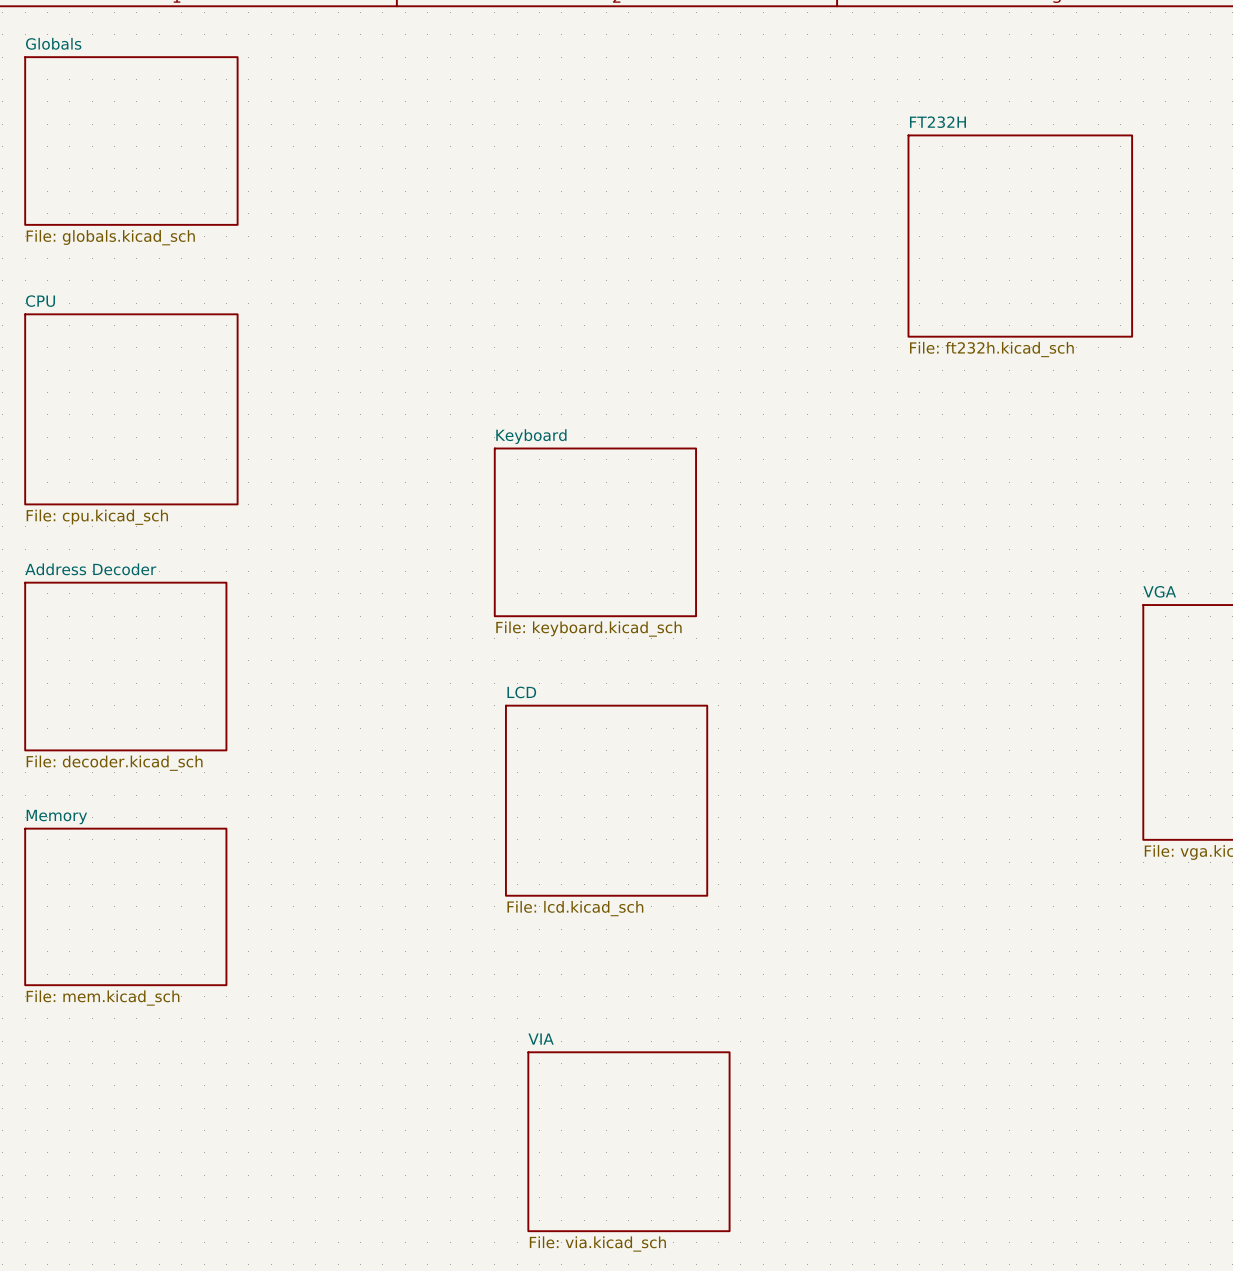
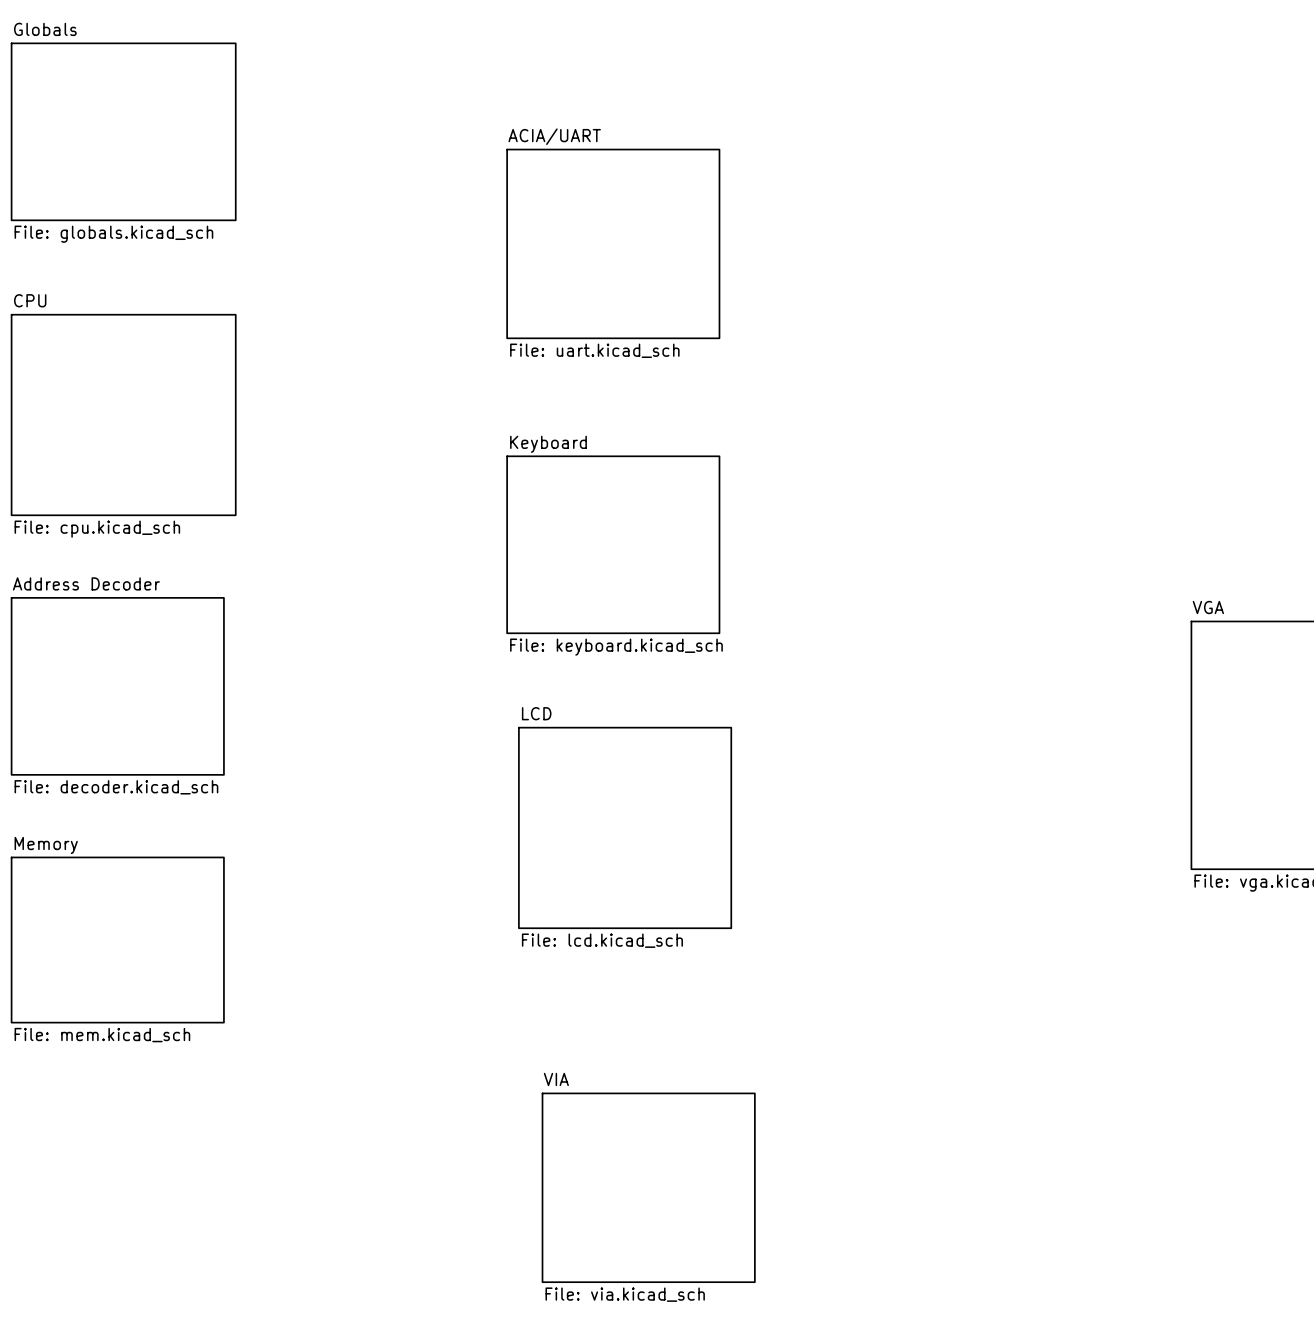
sheet FT232H: File: ft232h.kicad_sch (1020, 236) -> none
sheet ACIA/UART: none -> File: uart.kicad_sch (613, 243)

